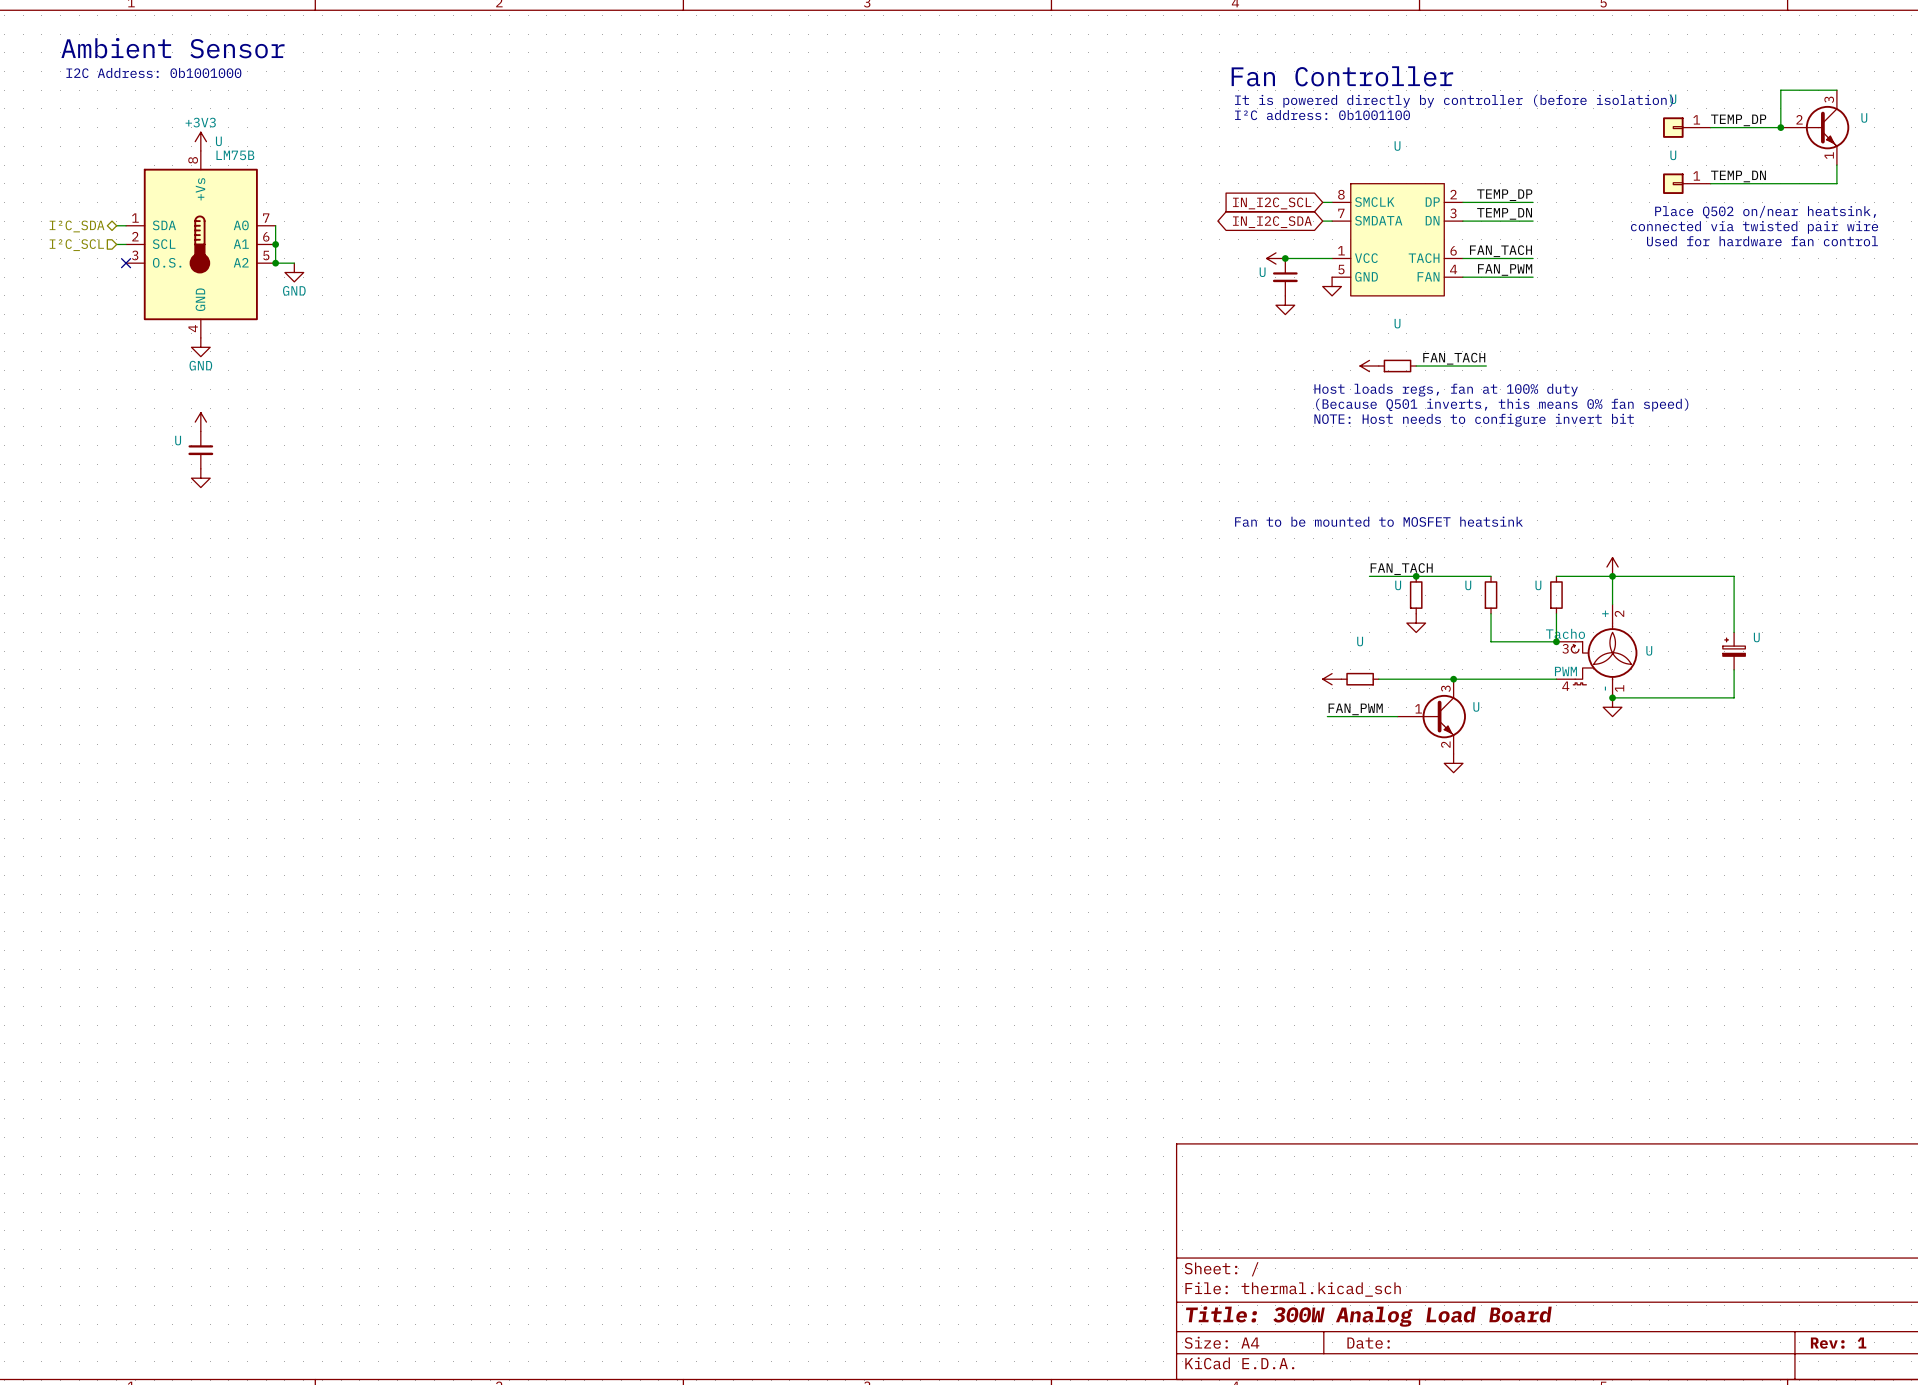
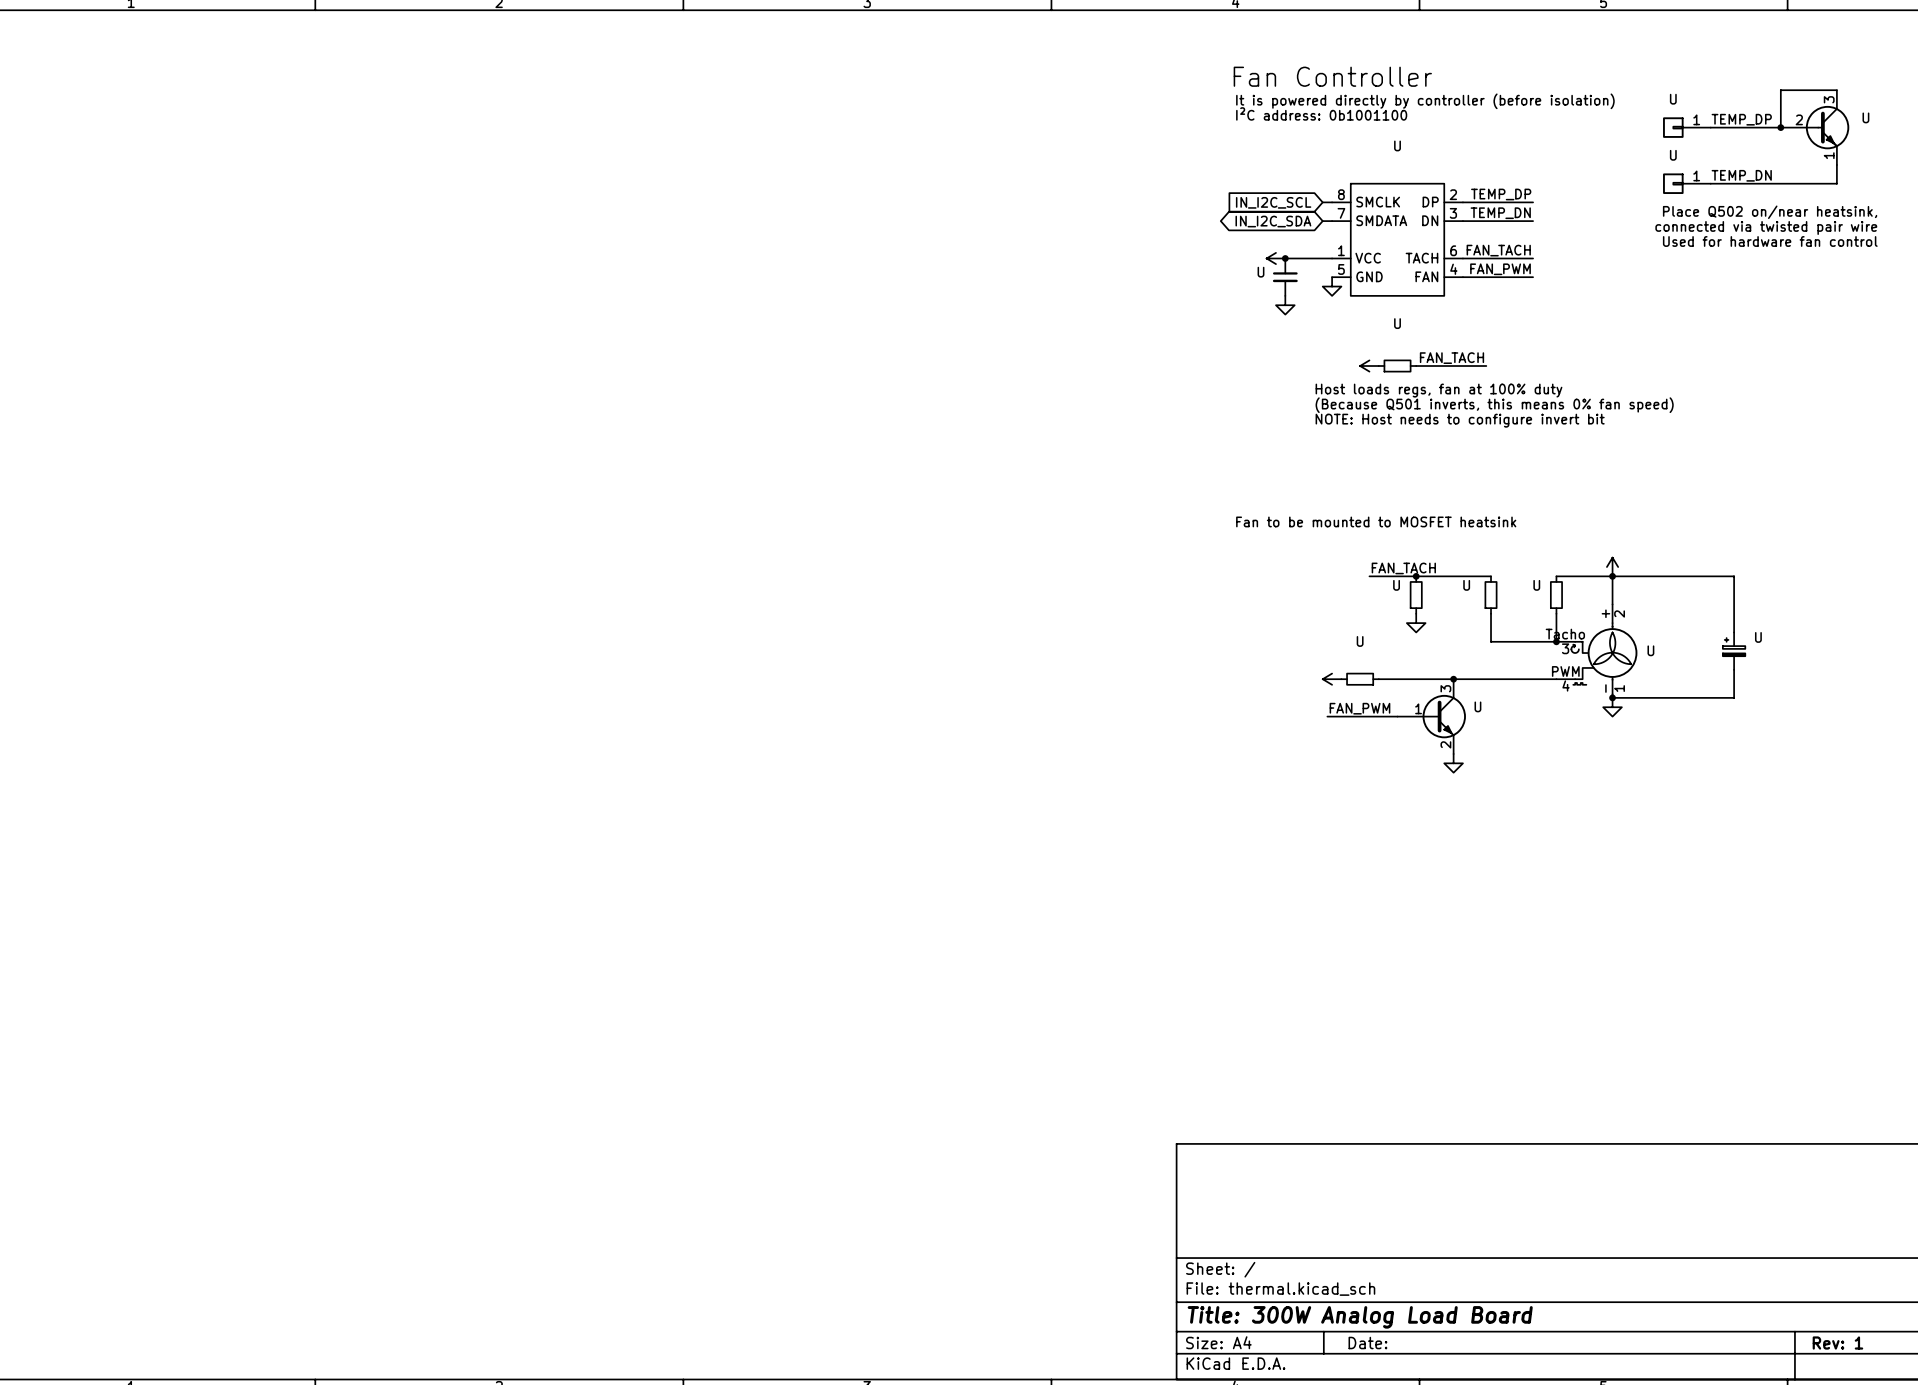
text: Ambient Sensor (172, 48) -> none
text: I2C Address: 0b1001000 (153, 73) -> none
power symbol: +3V3 (200, 141) -> none
wire: (116, 225) (126, 225) -> none
wire: (275, 225) (275, 263) (294, 263) -> none
hierarchical label: I²C_SDA (77, 226) -> none
wire: (116, 244) (126, 244) -> none
U: LM75B (200, 244) -> none
junction: (275, 244) -> none
hierarchical label: I²C_SCL (76, 245) -> none
no-connect mark: (126, 263) -> none
junction: (275, 263) -> none
power symbol: GND (294, 272) -> none
power symbol: GND (200, 347) -> none
power symbol: (200, 422) -> none
U: (200, 450) -> none
power symbol: (200, 478) -> none

